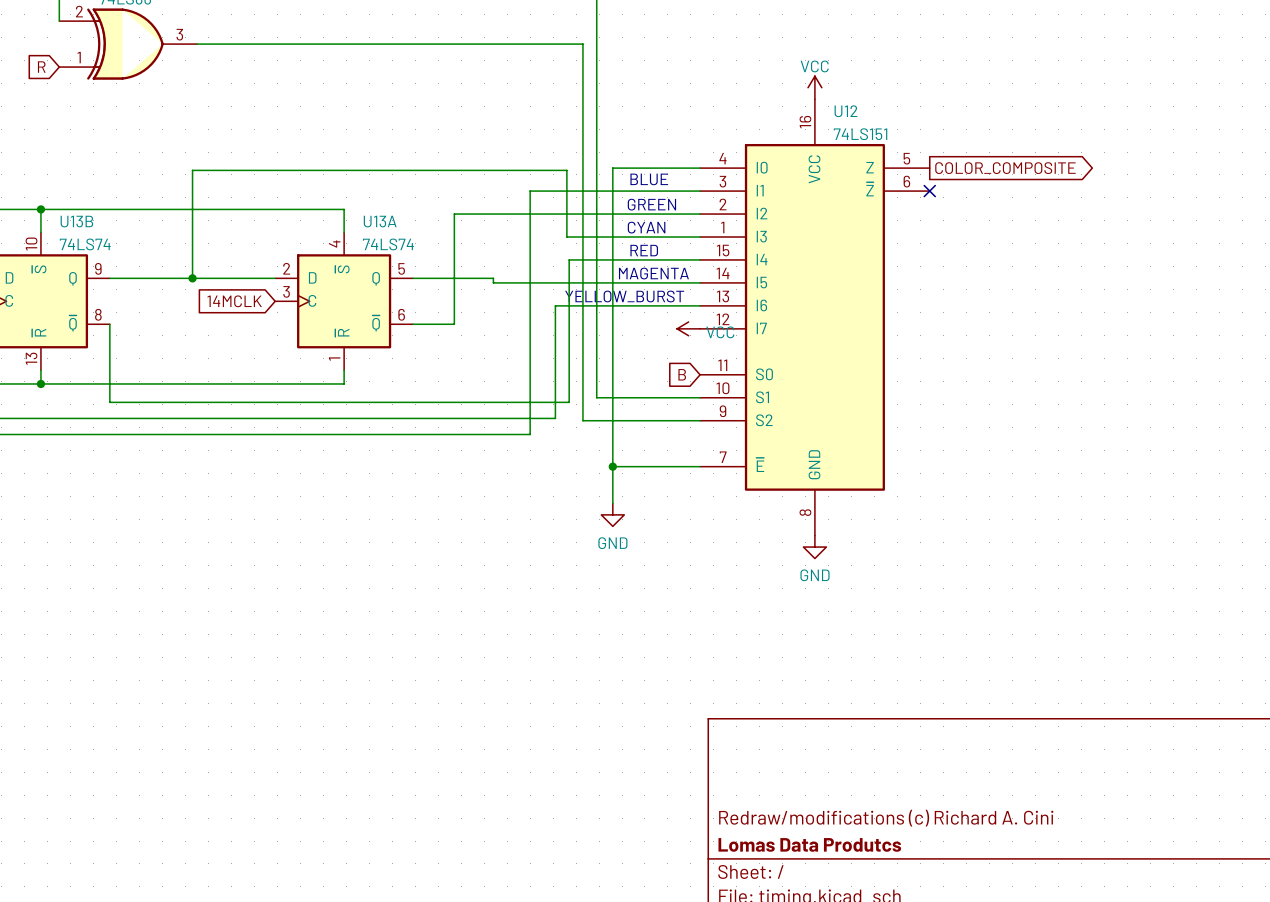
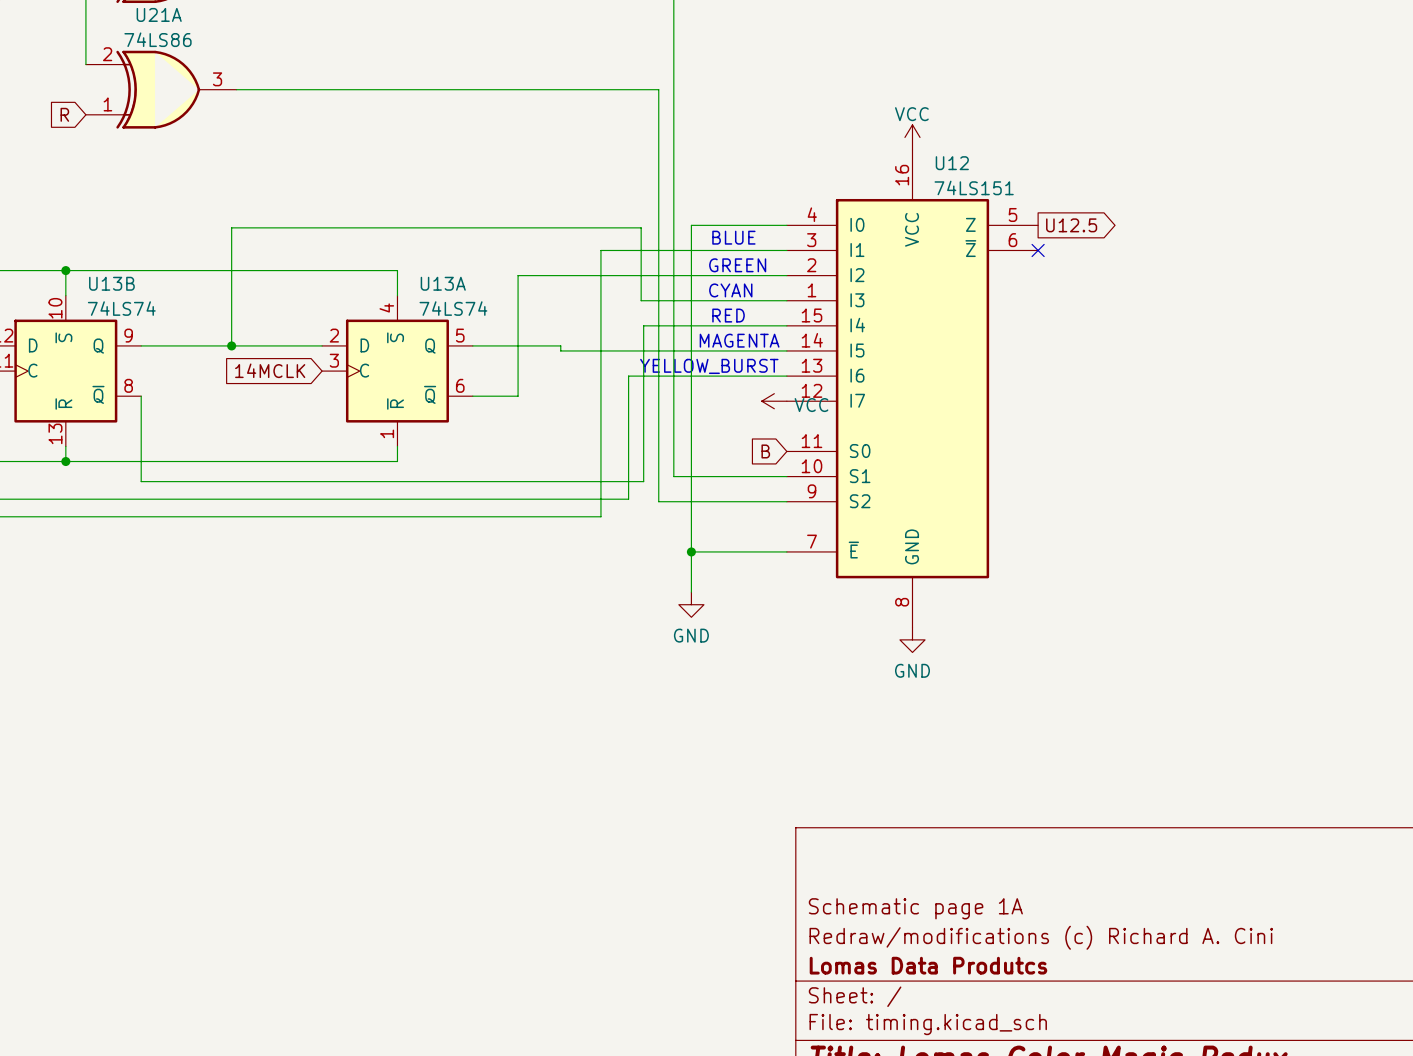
global label: COLOR_COMPOSITE (1005, 168) -> U12.5 (1071, 225)
title block: none -> Schematic page 1A (915, 908)

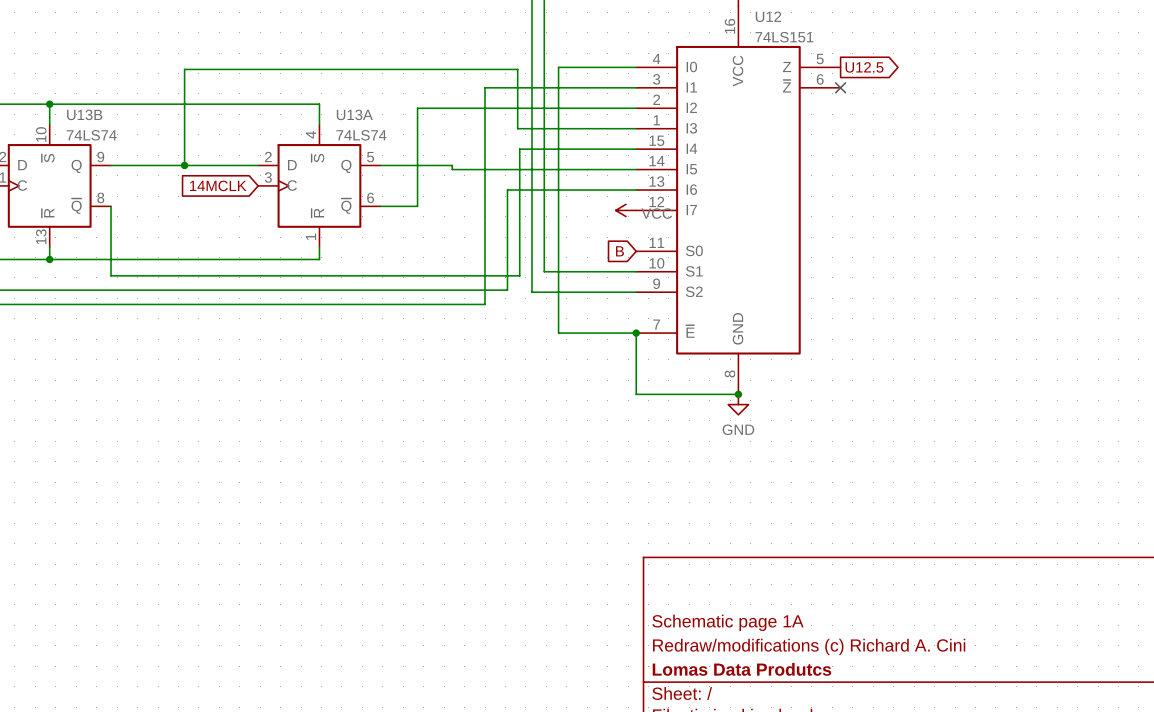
text: BLUE (733, 237) -> none
text: GREEN (737, 265) -> none
text: CYAN (730, 290) -> none
text: RED (728, 315) -> none
text: MAGENTA (739, 340) -> none
text: YELLOW_BURST (709, 366) -> none
wire: (691, 551) (691, 592) -> none
junction: (691, 551) -> none
wire: none -> (636, 333) (636, 394) (738, 394)
junction: none -> (636, 333)
power symbol: GND (691, 604) -> none
junction: none -> (738, 394)

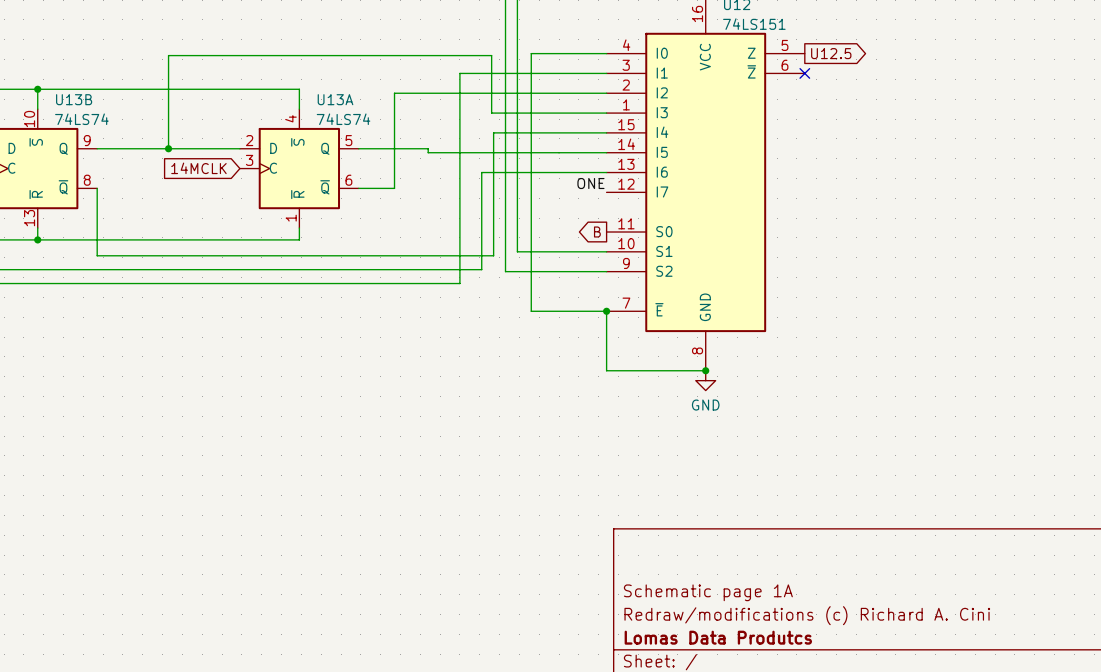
label: none -> ONE (590, 183)
power symbol: VCC (626, 210) -> none
global label shape: input (620, 251) -> output (597, 232)

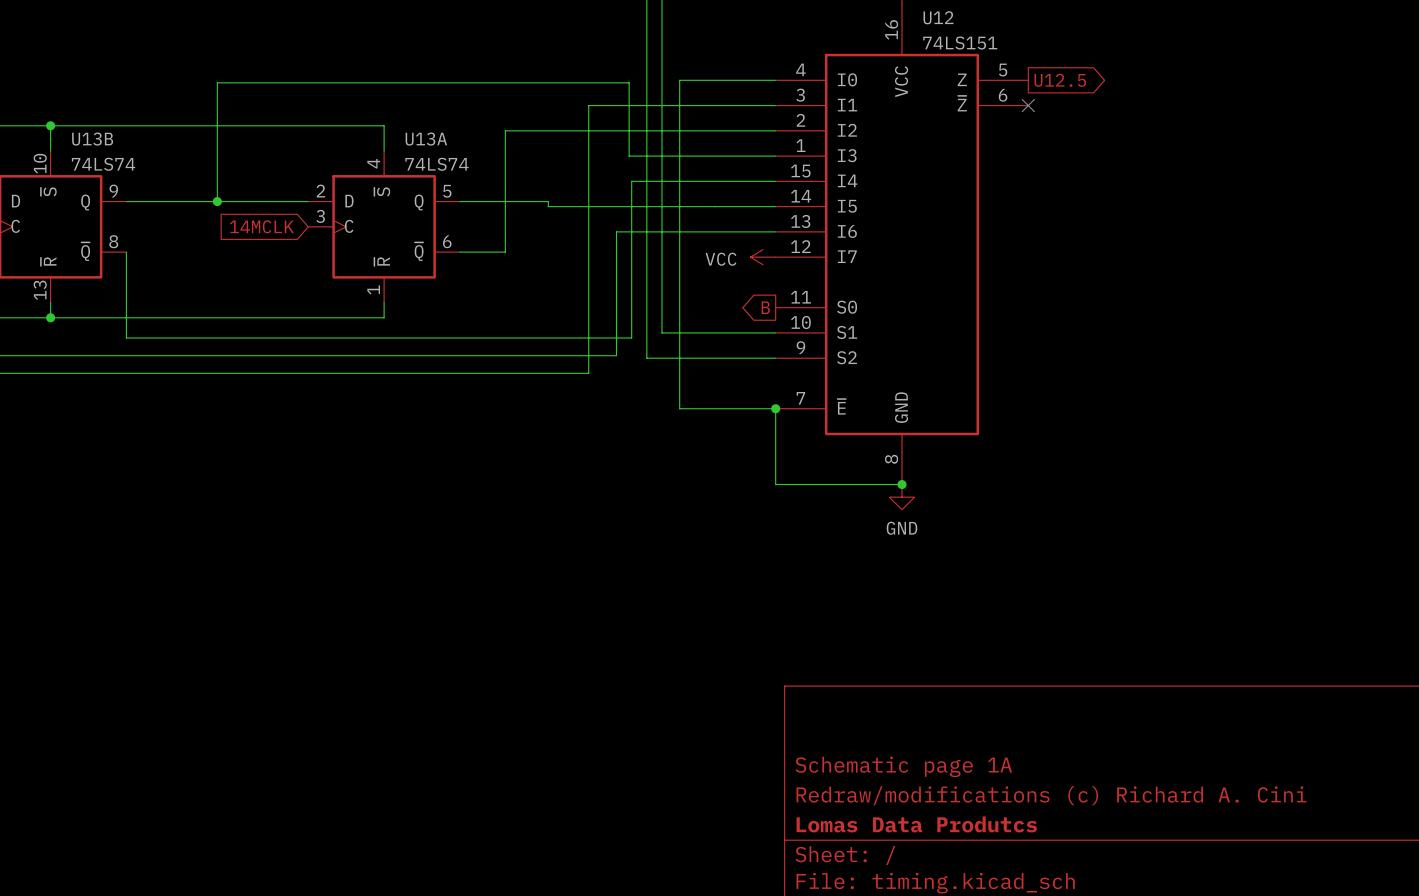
label: ONE (590, 183) -> none
power symbol: none -> VCC (763, 257)

